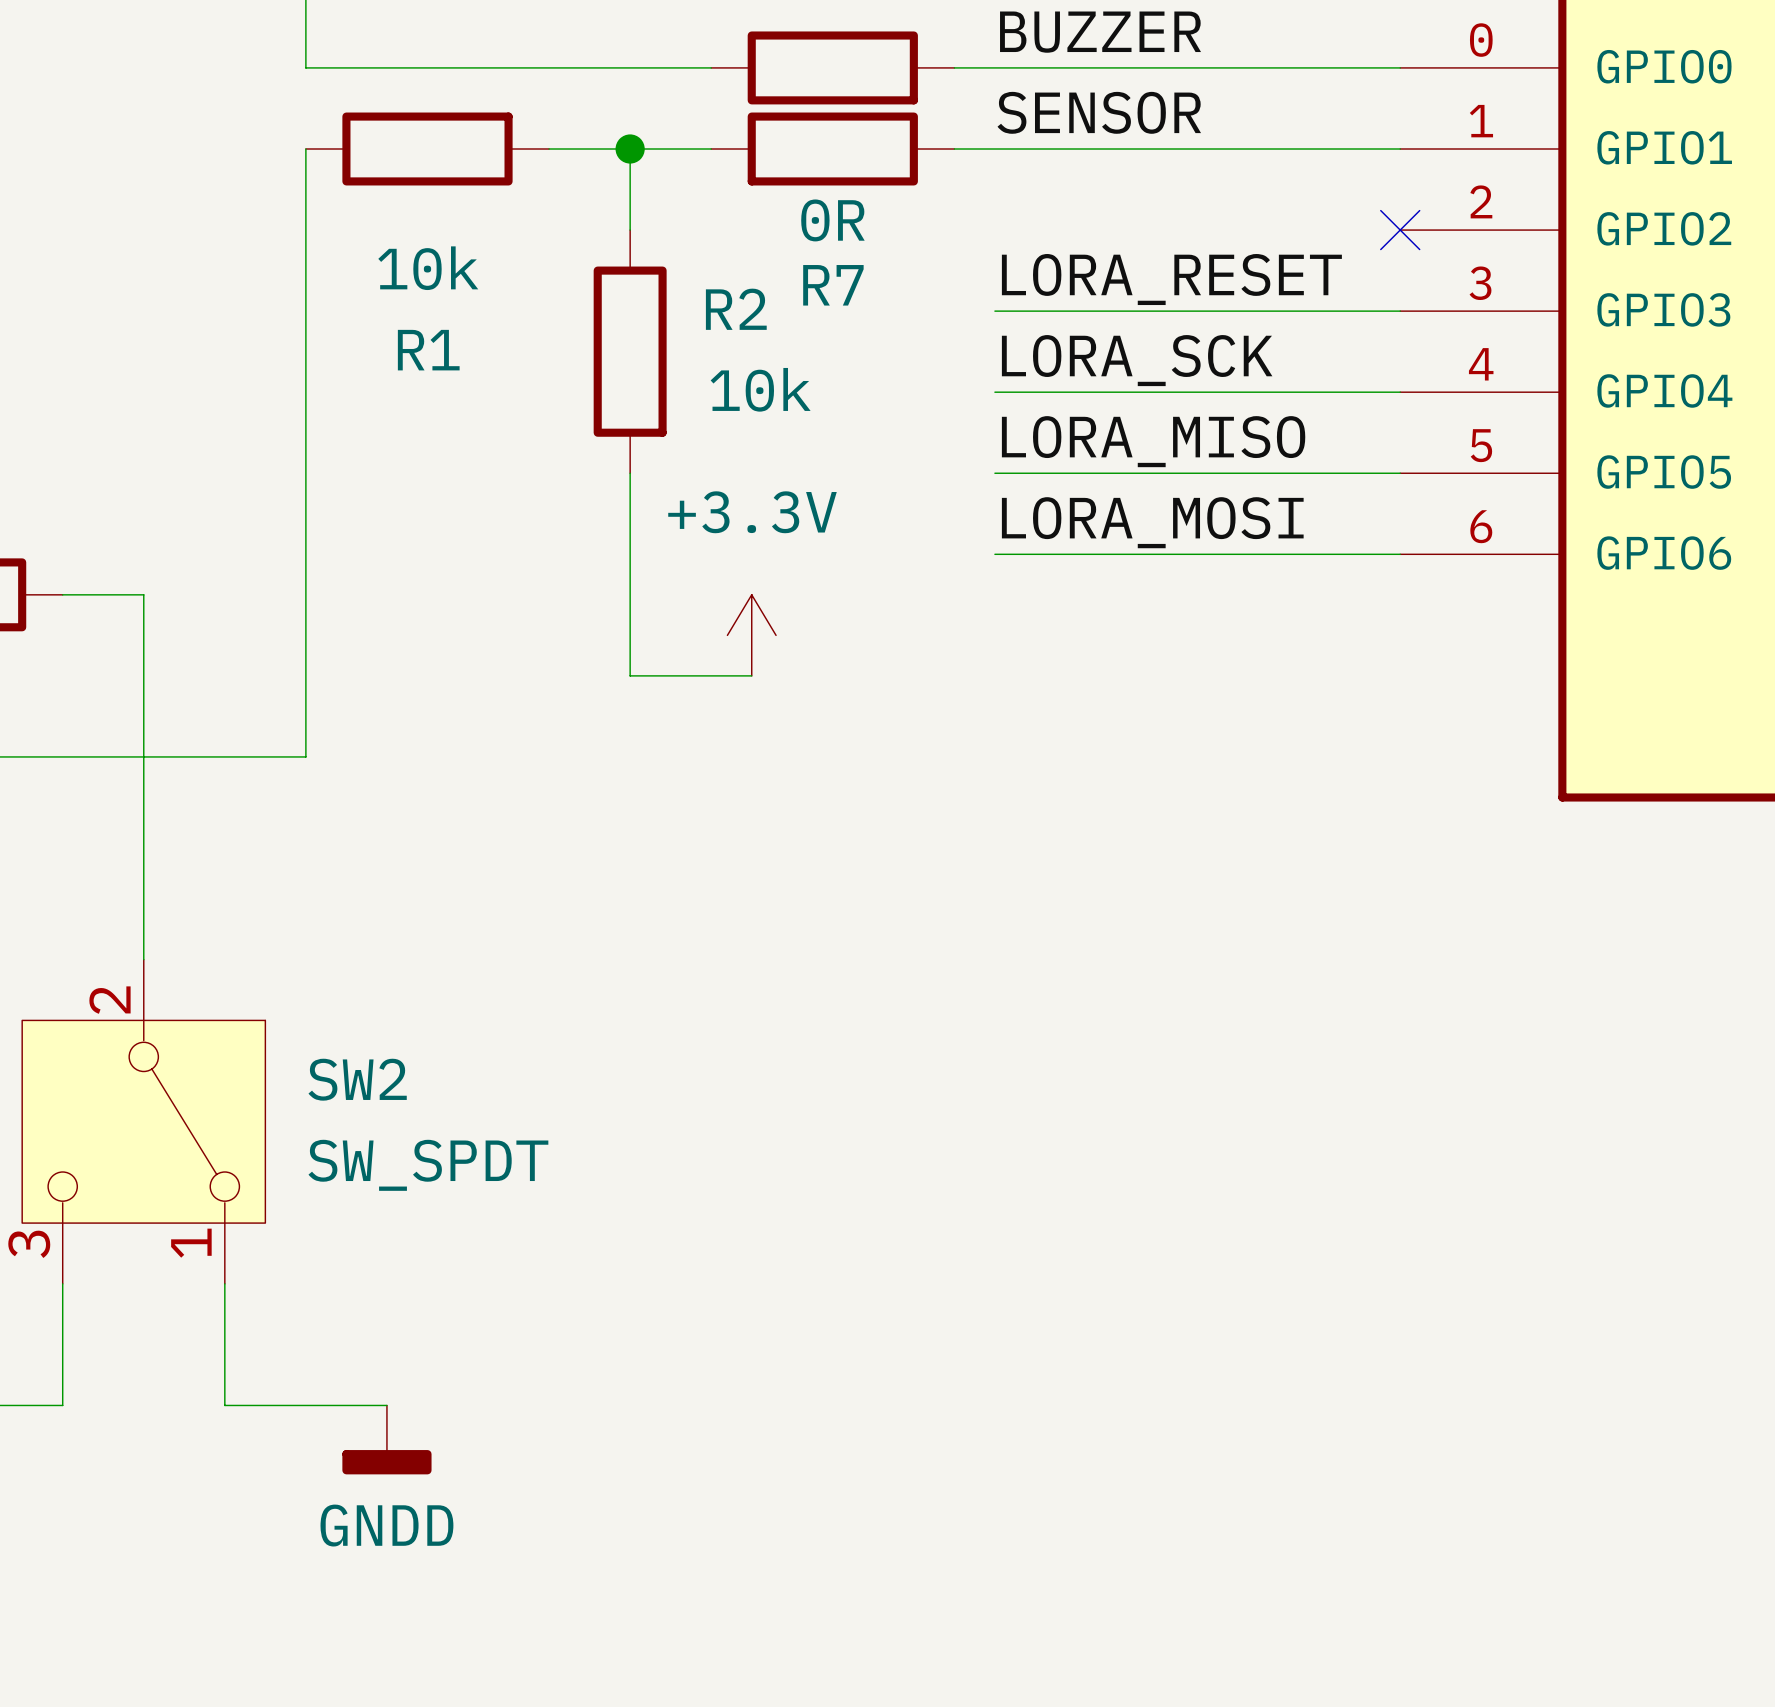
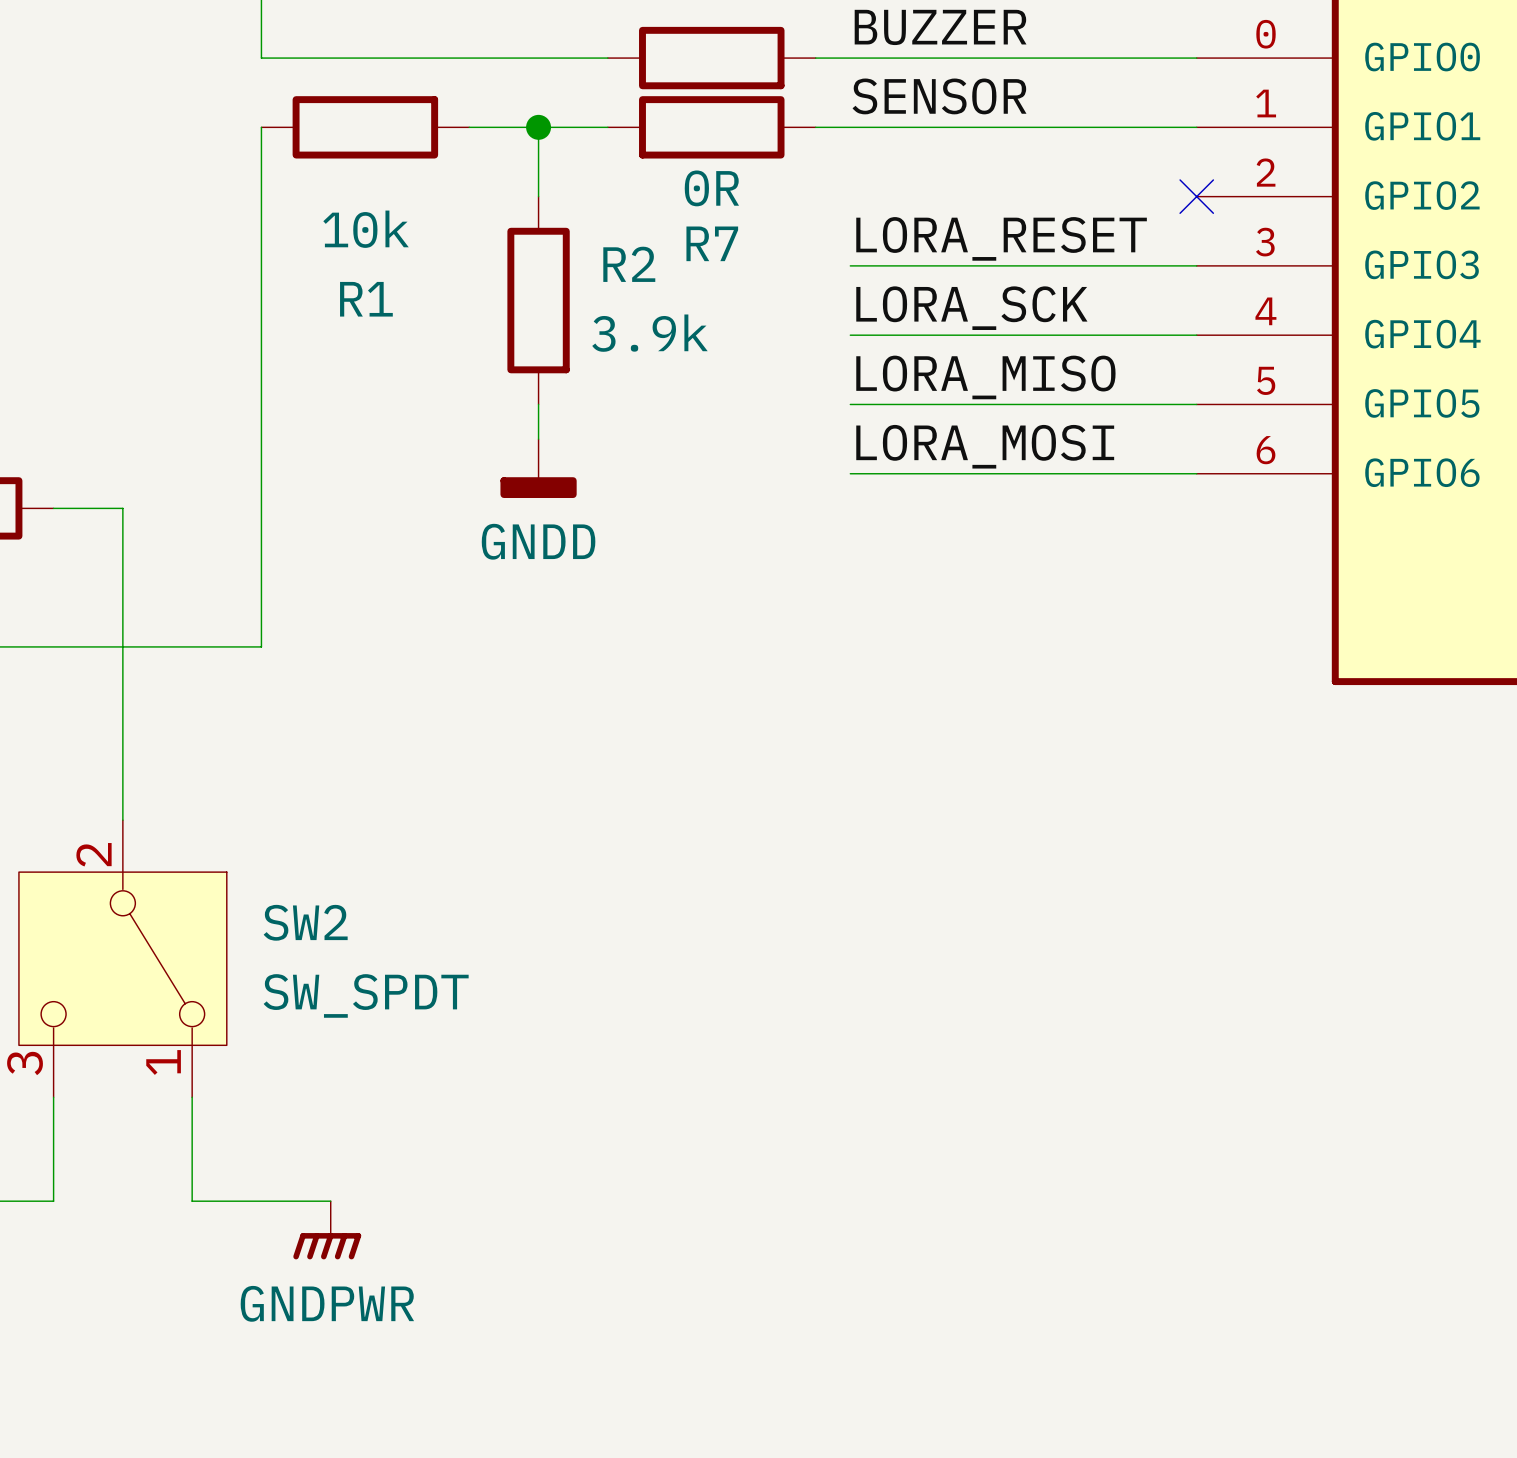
R2 value: 10k (760, 389) -> 3.9k (649, 333)
wire: (630, 513) (630, 675) (751, 675) -> none
power symbol: none -> GNDD (538, 468)
power symbol: +3.3V (751, 635) -> none
power symbol: GNDD (386, 1439) -> GNDPWR (327, 1230)

